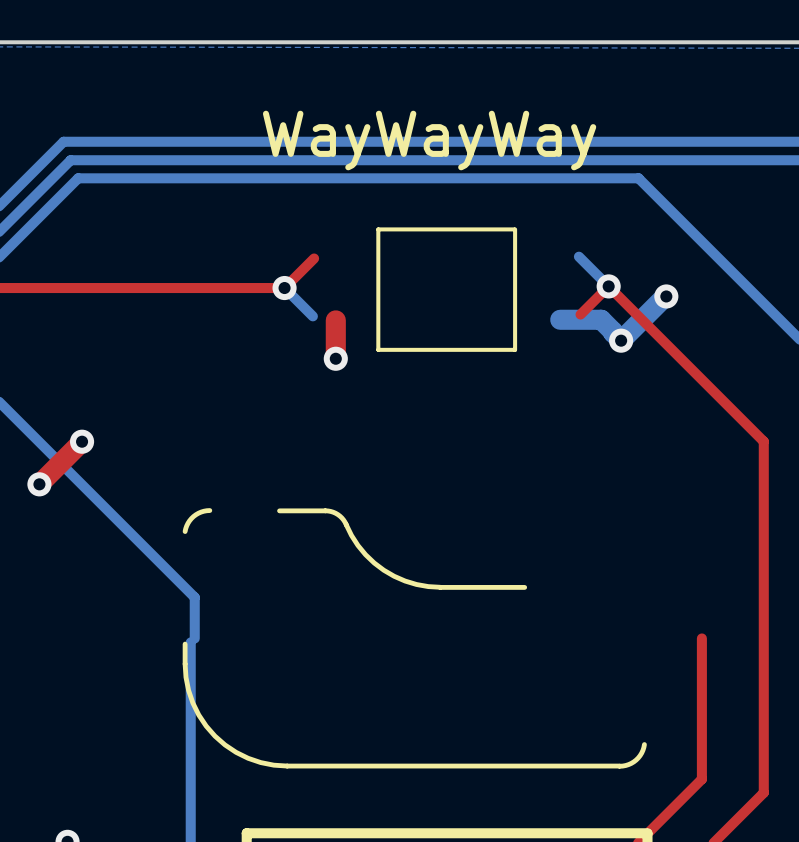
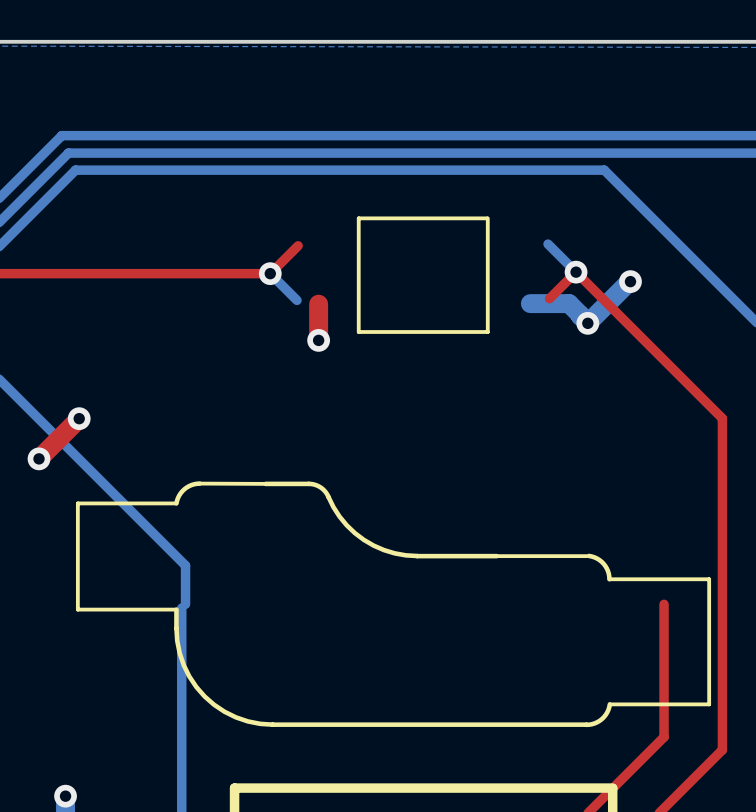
text: WayWayWay (429, 140) -> none
drawing shape: [182, 508, 647, 769] -> [75, 481, 712, 728]

